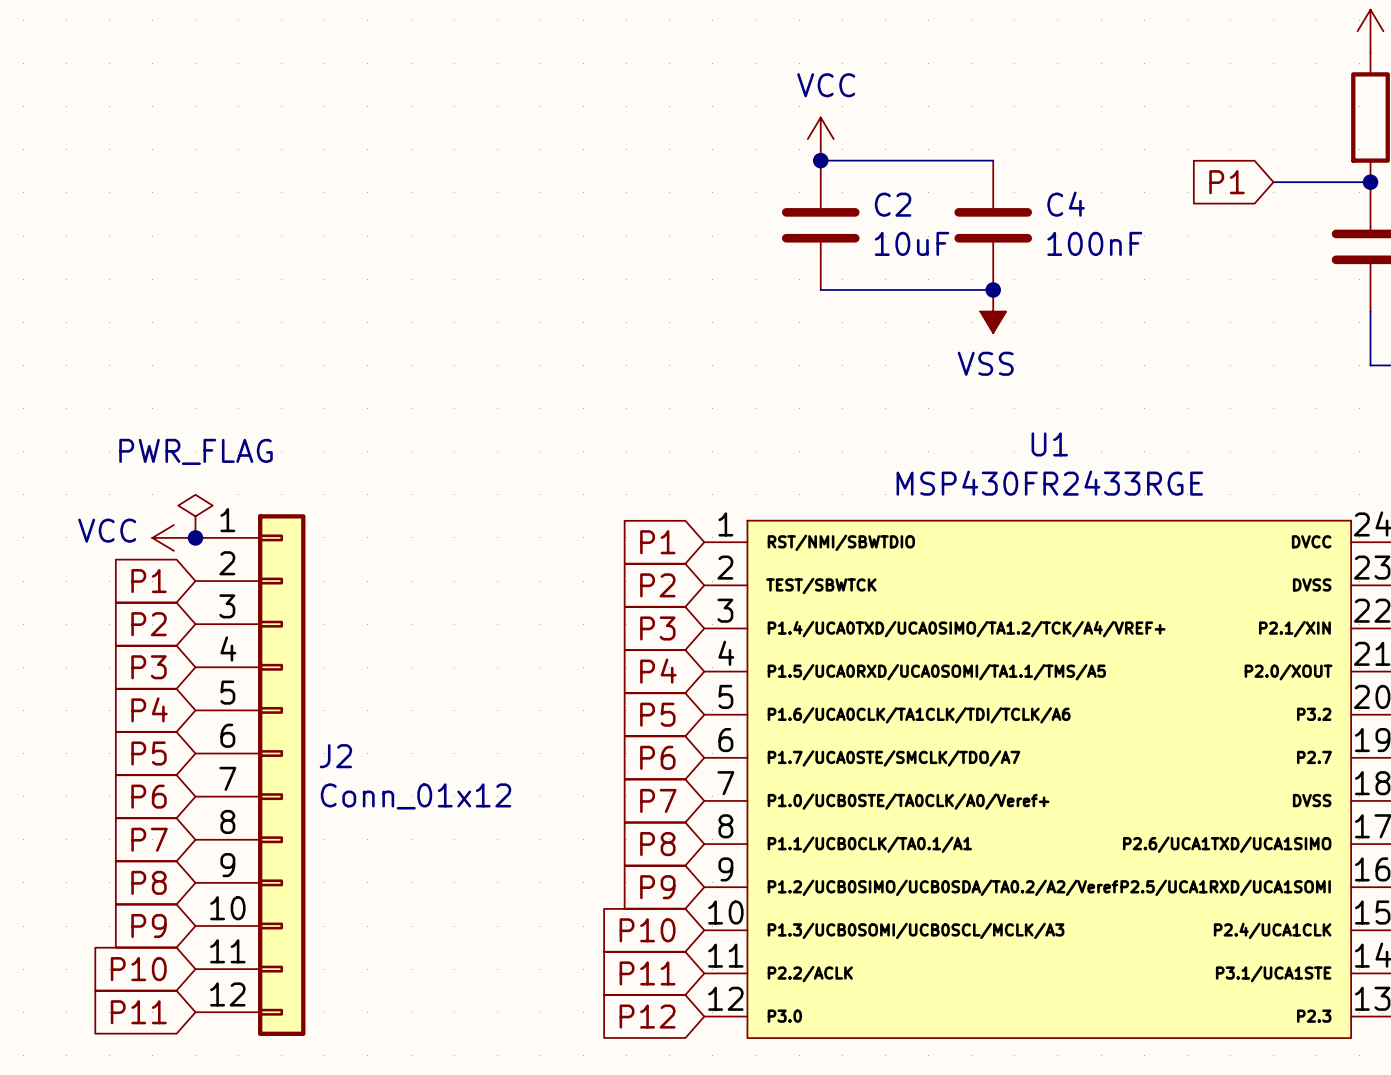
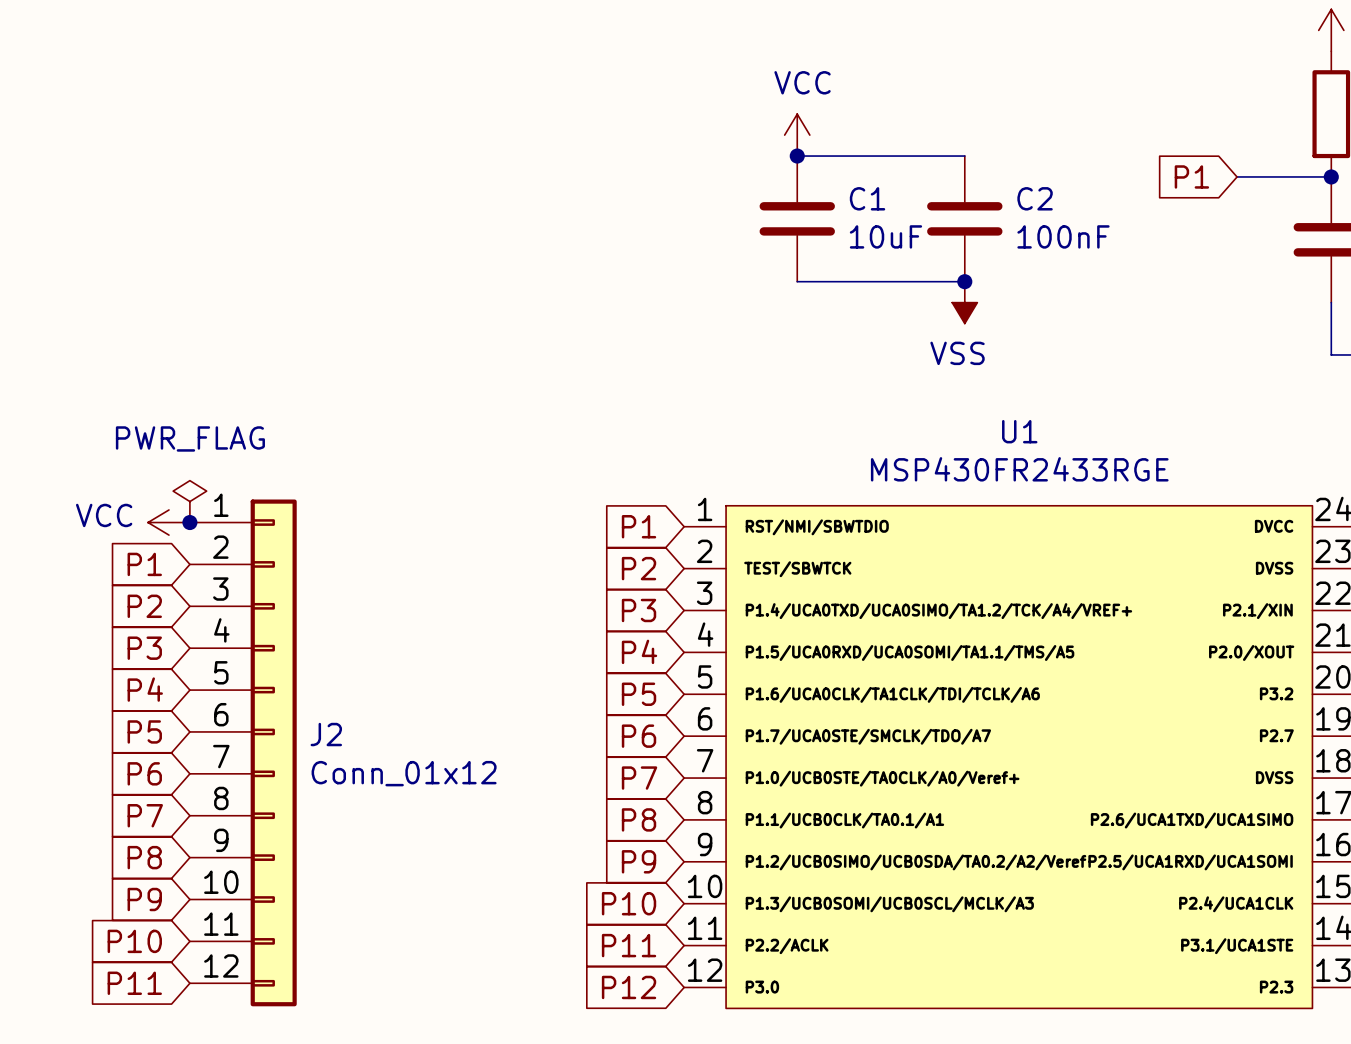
C2 name: C2 (893, 204) -> C1 (867, 198)
C4 name: C4 (1066, 204) -> C2 (1035, 198)

